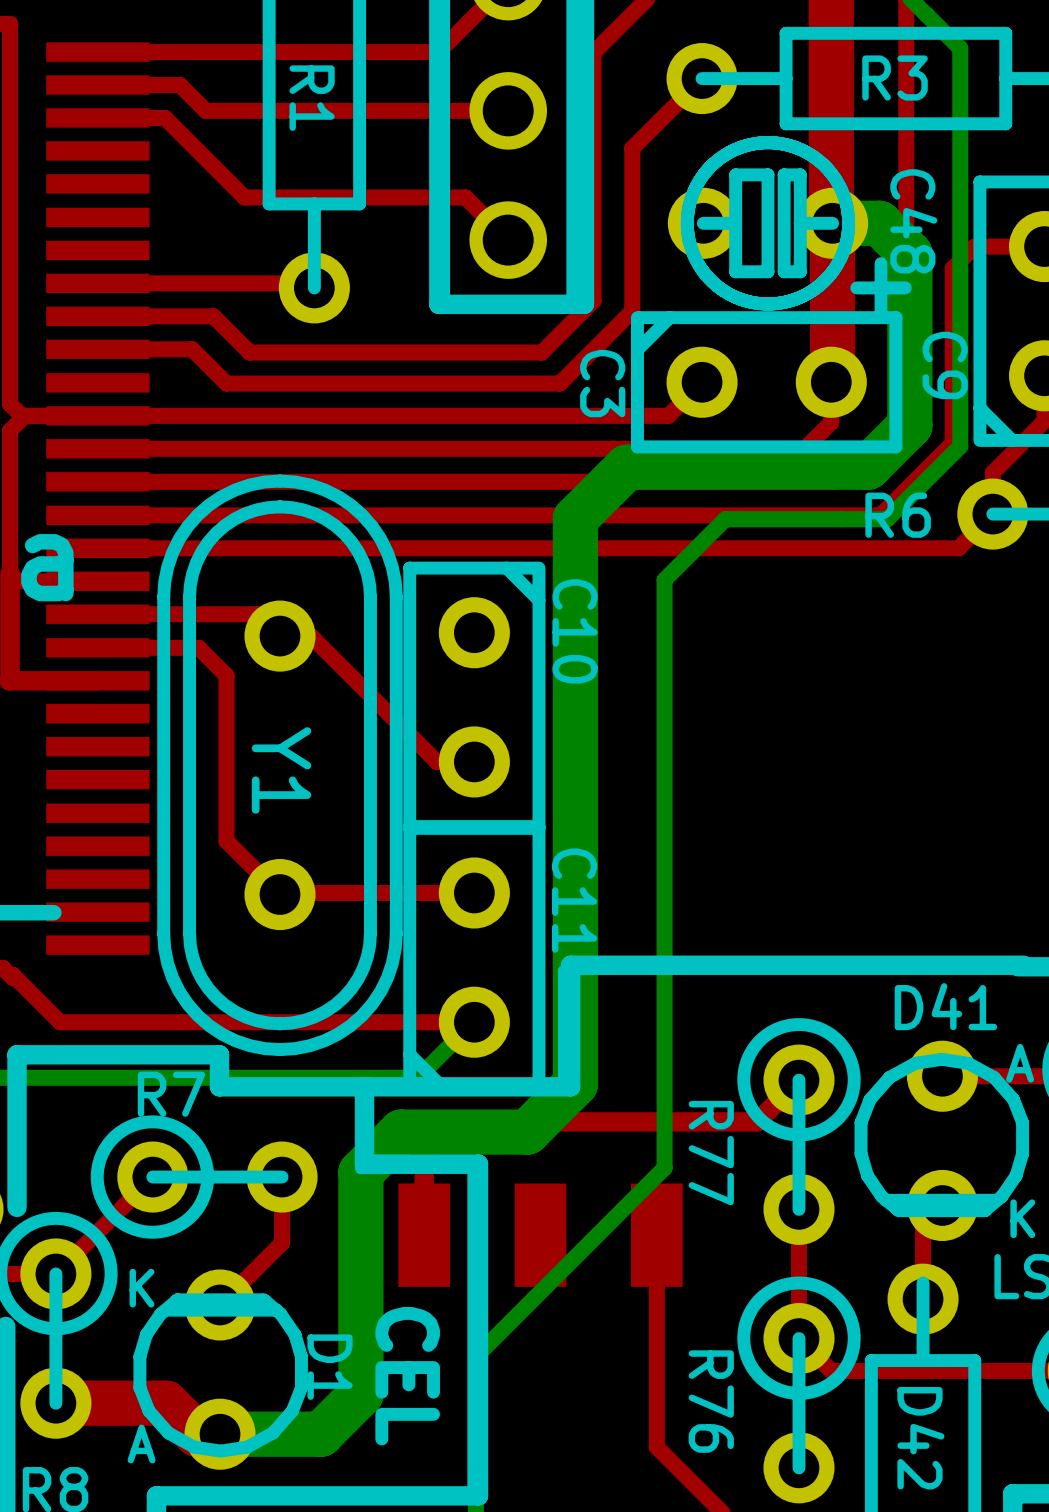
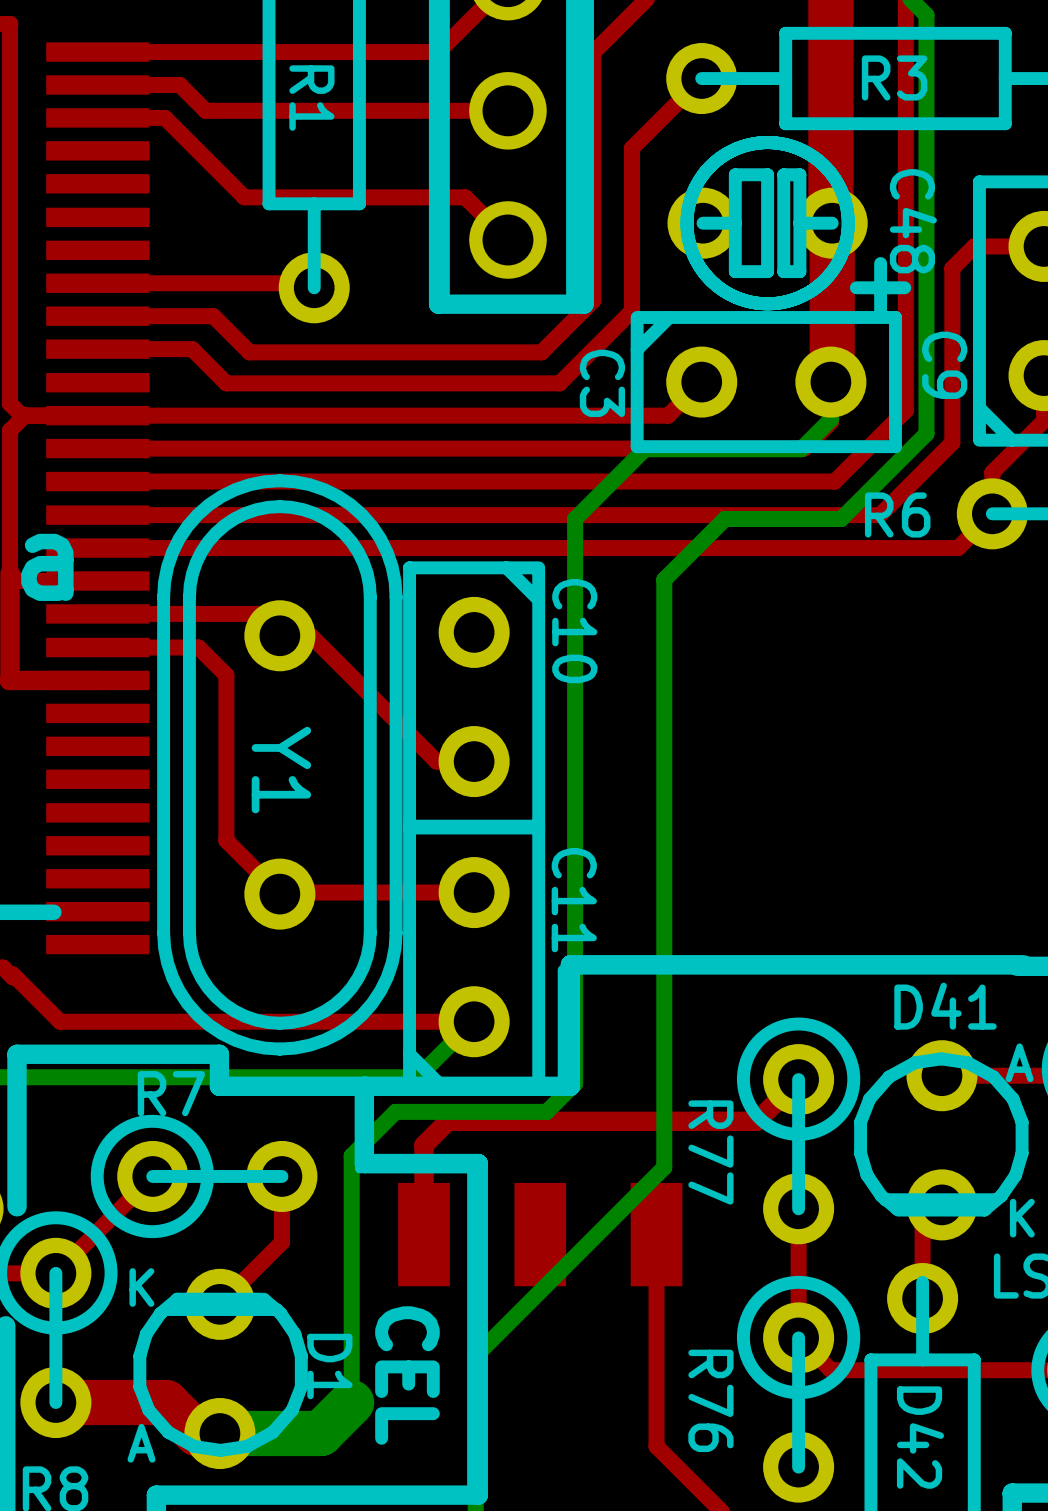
bottom track: (926, 15) (960, 48) (960, 446) (887, 519) (841, 519) -> (926, 15) (926, 433) (841, 519)
bottom track: (832, 223) (879, 223) (909, 253) (909, 425) (868, 467) (626, 467) (575, 518) -> (830, 382) (830, 419) (801, 449) (644, 449) (575, 519)
bottom track width: thick (575, 518) (575, 1084) (546, 1112) -> thin (575, 518) (575, 1083) (546, 1111)
bottom track: (546, 1112) (527, 1132) (401, 1132) (360, 1172) (360, 1394) (351, 1403) -> (546, 1111) (395, 1111) (351, 1155) (351, 1402)

